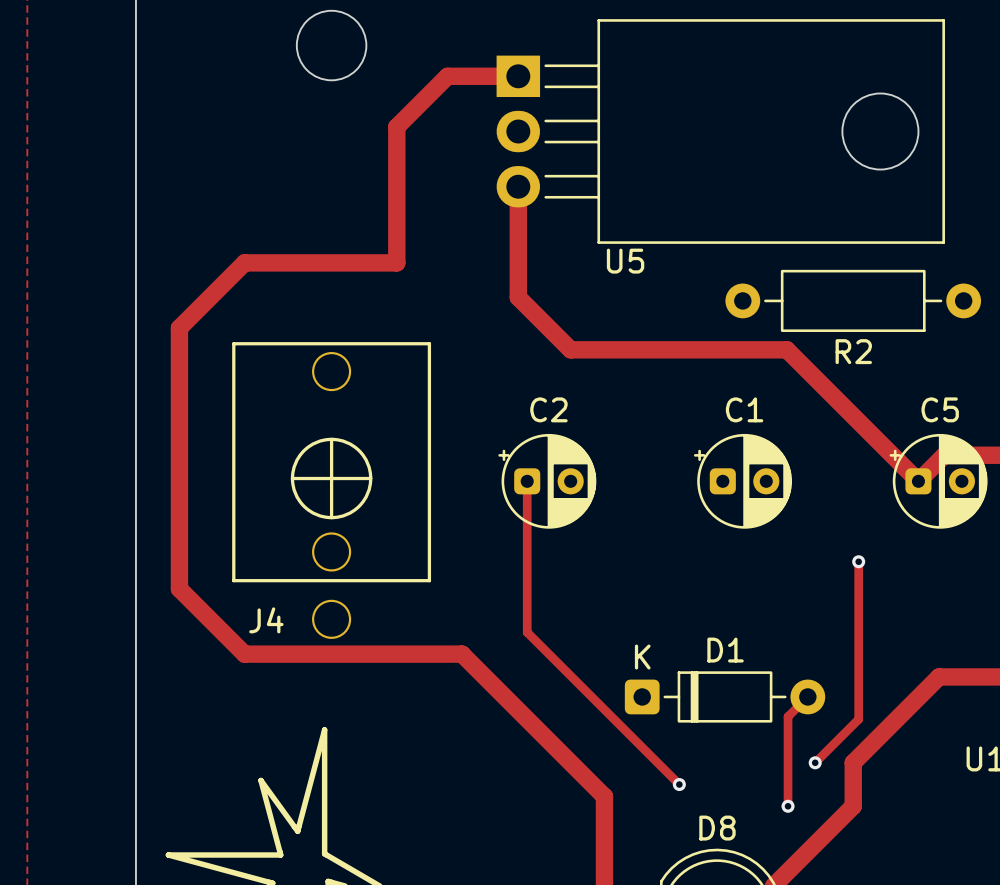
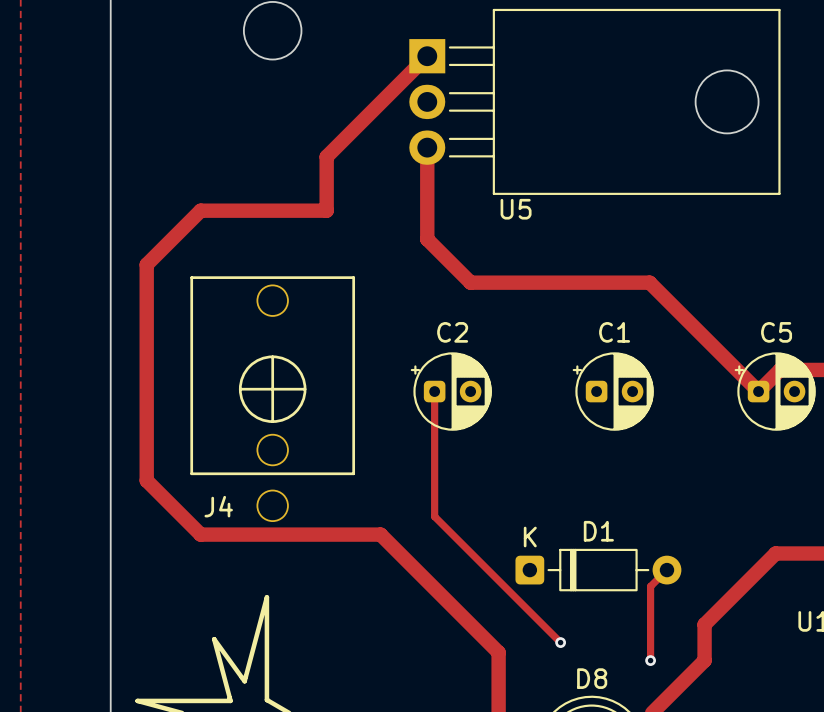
track: (518, 76) (447, 76) (396, 127) (396, 197) -> (427, 56) (326, 156)
R2: (853, 300) -> none
track: (858, 561) (858, 719) (815, 762) -> none
via: (858, 561) -> none
via: (815, 762) -> none

